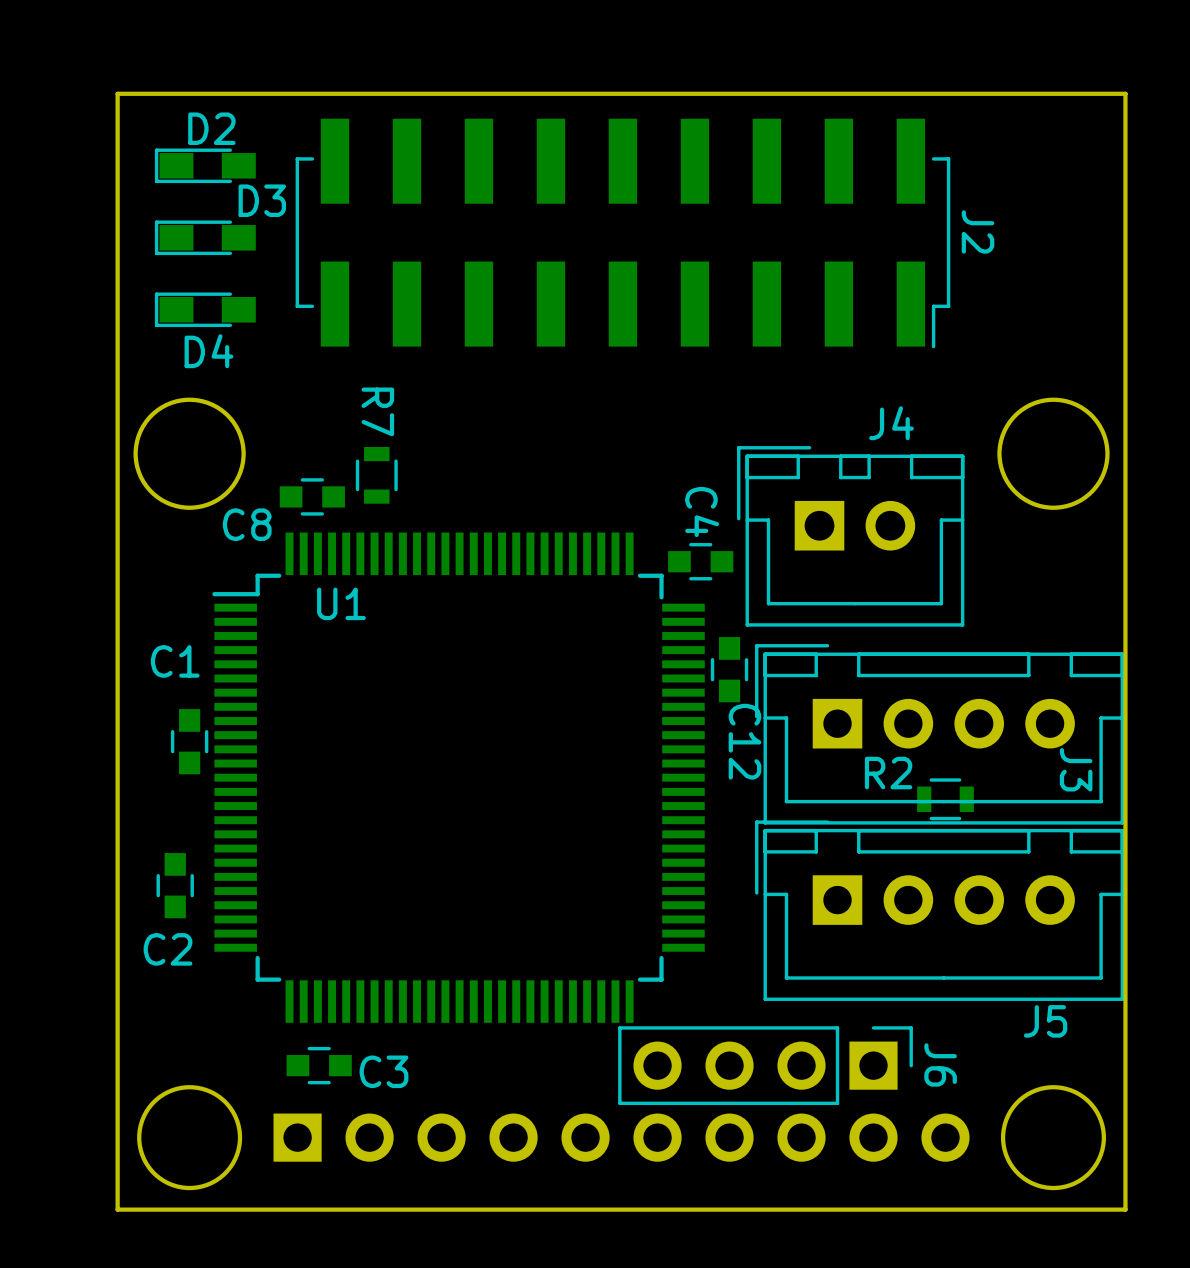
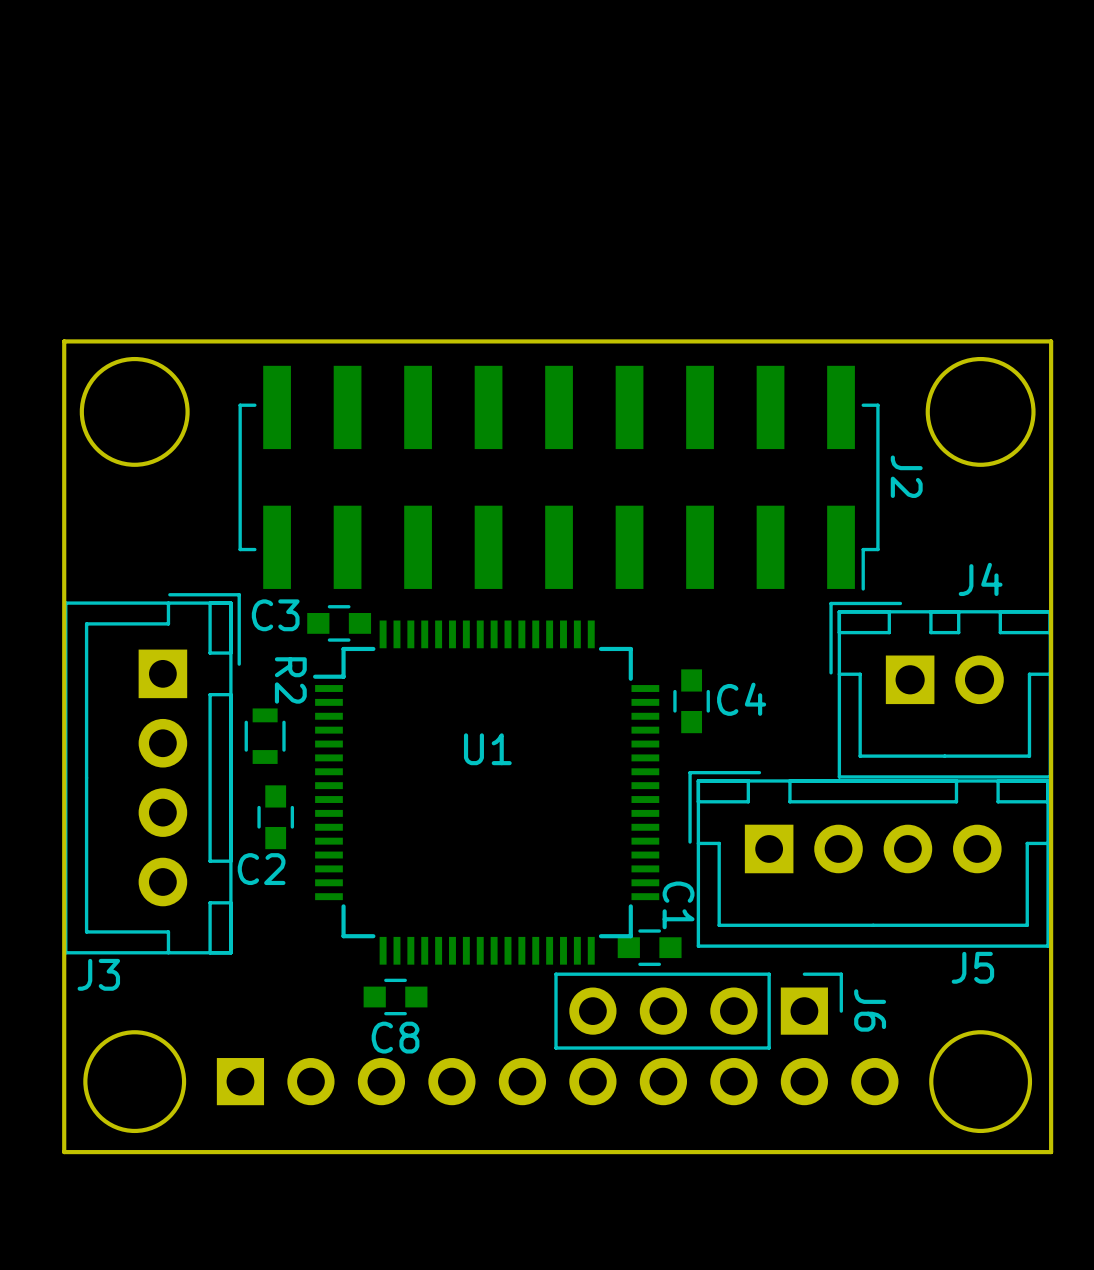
D2: (205, 165) -> none
J2 position: (622, 233) -> (559, 478)
D3: (205, 237) -> none
D4: (205, 309) -> none
board edge: (1125, 381) (1125, 93) (117, 93) (117, 381) -> (1051, 341) (64, 341)
R7: (376, 475) -> none
C8 position: (312, 496) -> (395, 997)
C8 name position: C8 (247, 524) -> C8 (395, 1037)
U1 footprint: [212, 532, 705, 1023] -> [313, 620, 660, 965]
J4 position: (850, 536) -> (940, 690)
C4 rotation: 0° (700, 561) -> 90° clockwise (691, 701)
C4 position: (700, 561) -> (691, 701)
U1 name position: U1 (341, 603) -> U1 (487, 749)
C12: (729, 669) -> none
J3 rotation: 0° (939, 734) -> 90° clockwise (152, 773)
J3 position: (939, 734) -> (152, 773)
C1 rotation: 0° (189, 741) -> 90° clockwise (649, 947)
C1 position: (189, 741) -> (649, 947)
J3 name position: J3 (1076, 769) -> J3 (98, 974)
R2 rotation: 0° (945, 799) -> 90° clockwise (265, 736)
R2 position: (945, 799) -> (265, 736)
C2 position: (175, 885) -> (275, 817)
C2 name position: C2 (168, 949) -> C2 (261, 869)
C3 position: (319, 1065) -> (339, 623)
C3 name position: C3 (383, 1071) -> C3 (275, 615)

